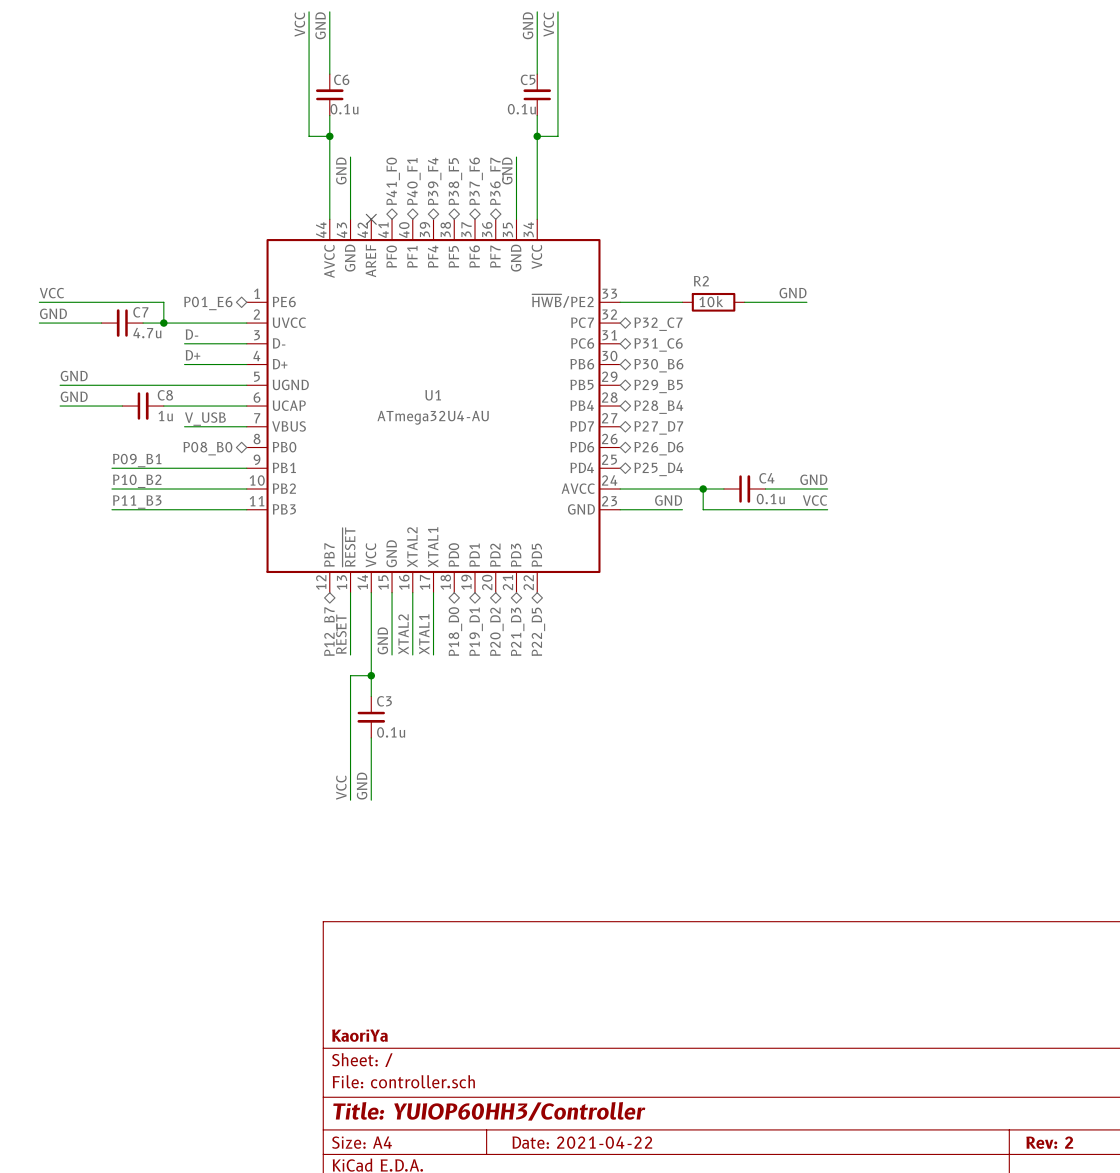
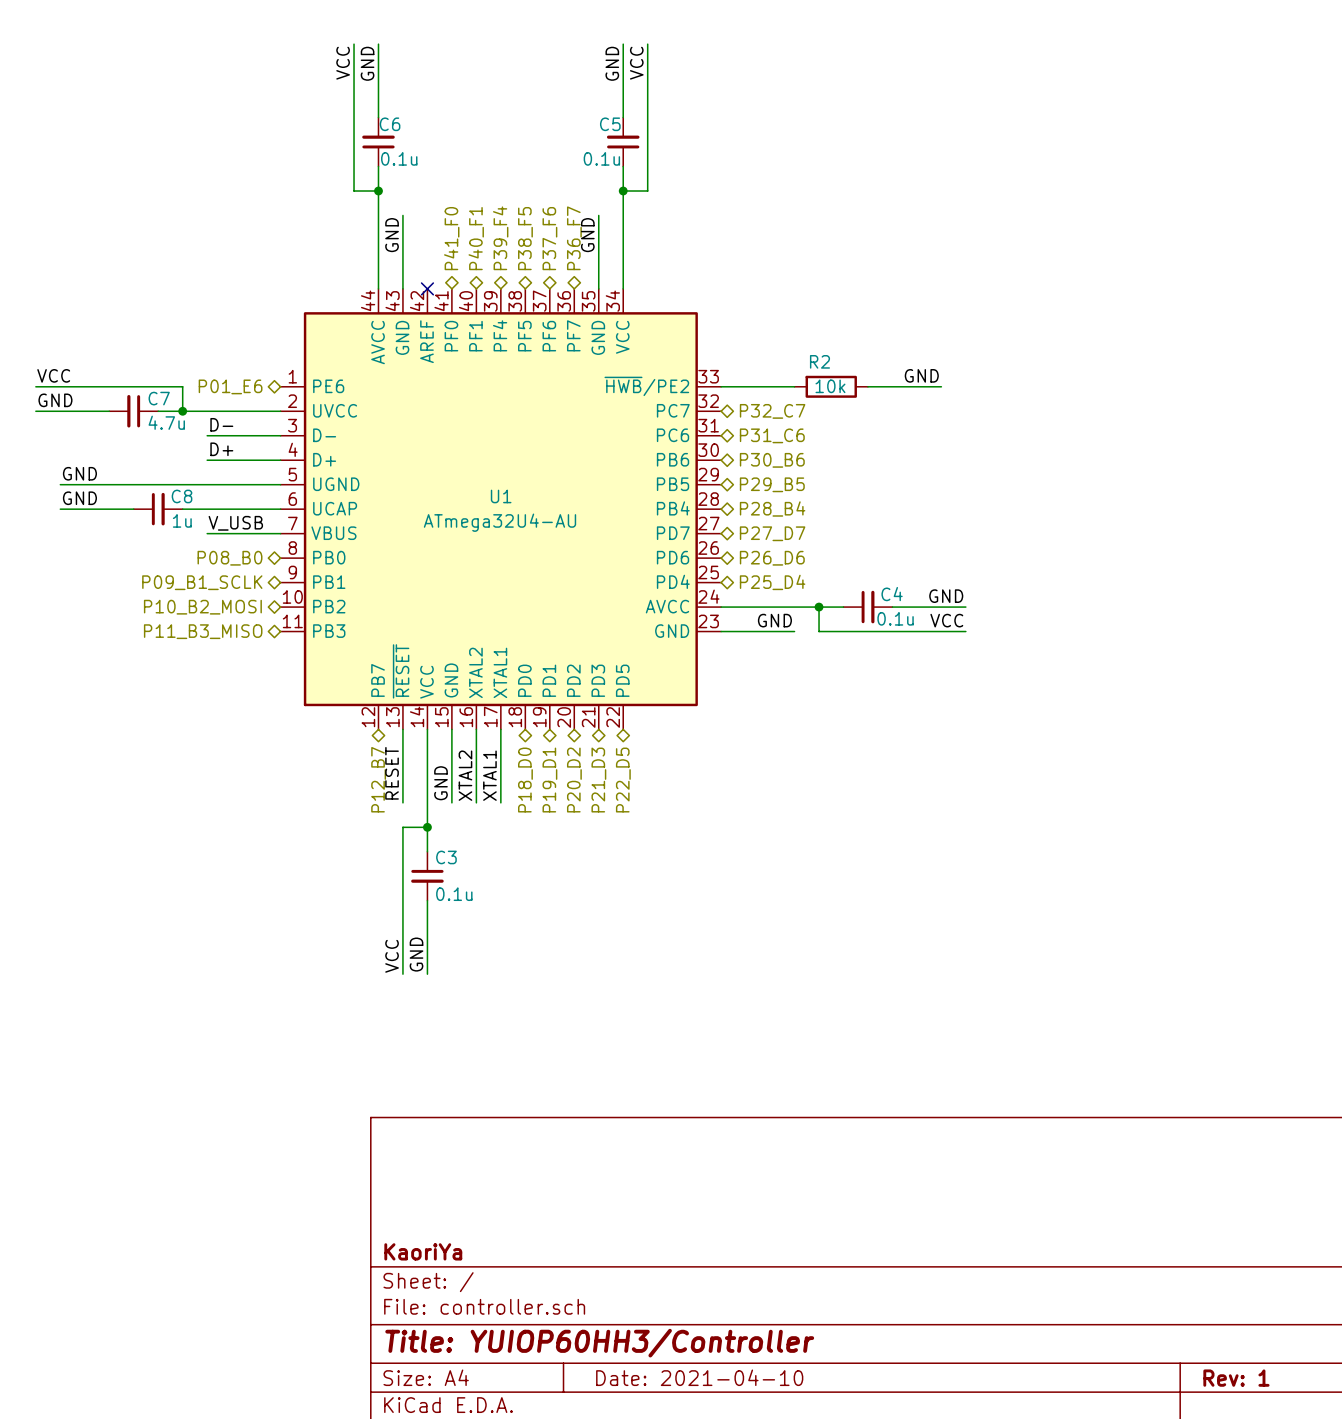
label: P09_B1 (137, 460) -> none
wire: (111, 468) (246, 468) -> none
hierarchical label: none -> P09_B1_SCLK (202, 582)
label: P10_B2 (137, 481) -> none
wire: (111, 489) (246, 489) -> none
hierarchical label: none -> P10_B2_MOSI (202, 607)
label: P11_B3 (137, 502) -> none
wire: (111, 509) (246, 509) -> none
hierarchical label: none -> P11_B3_MISO (203, 631)
title block: Date: 2021-04-22 (582, 1142) -> Date: 2021-04-10 (699, 1377)
title block: Rev: 2 (1049, 1142) -> Rev: 1 (1236, 1378)

